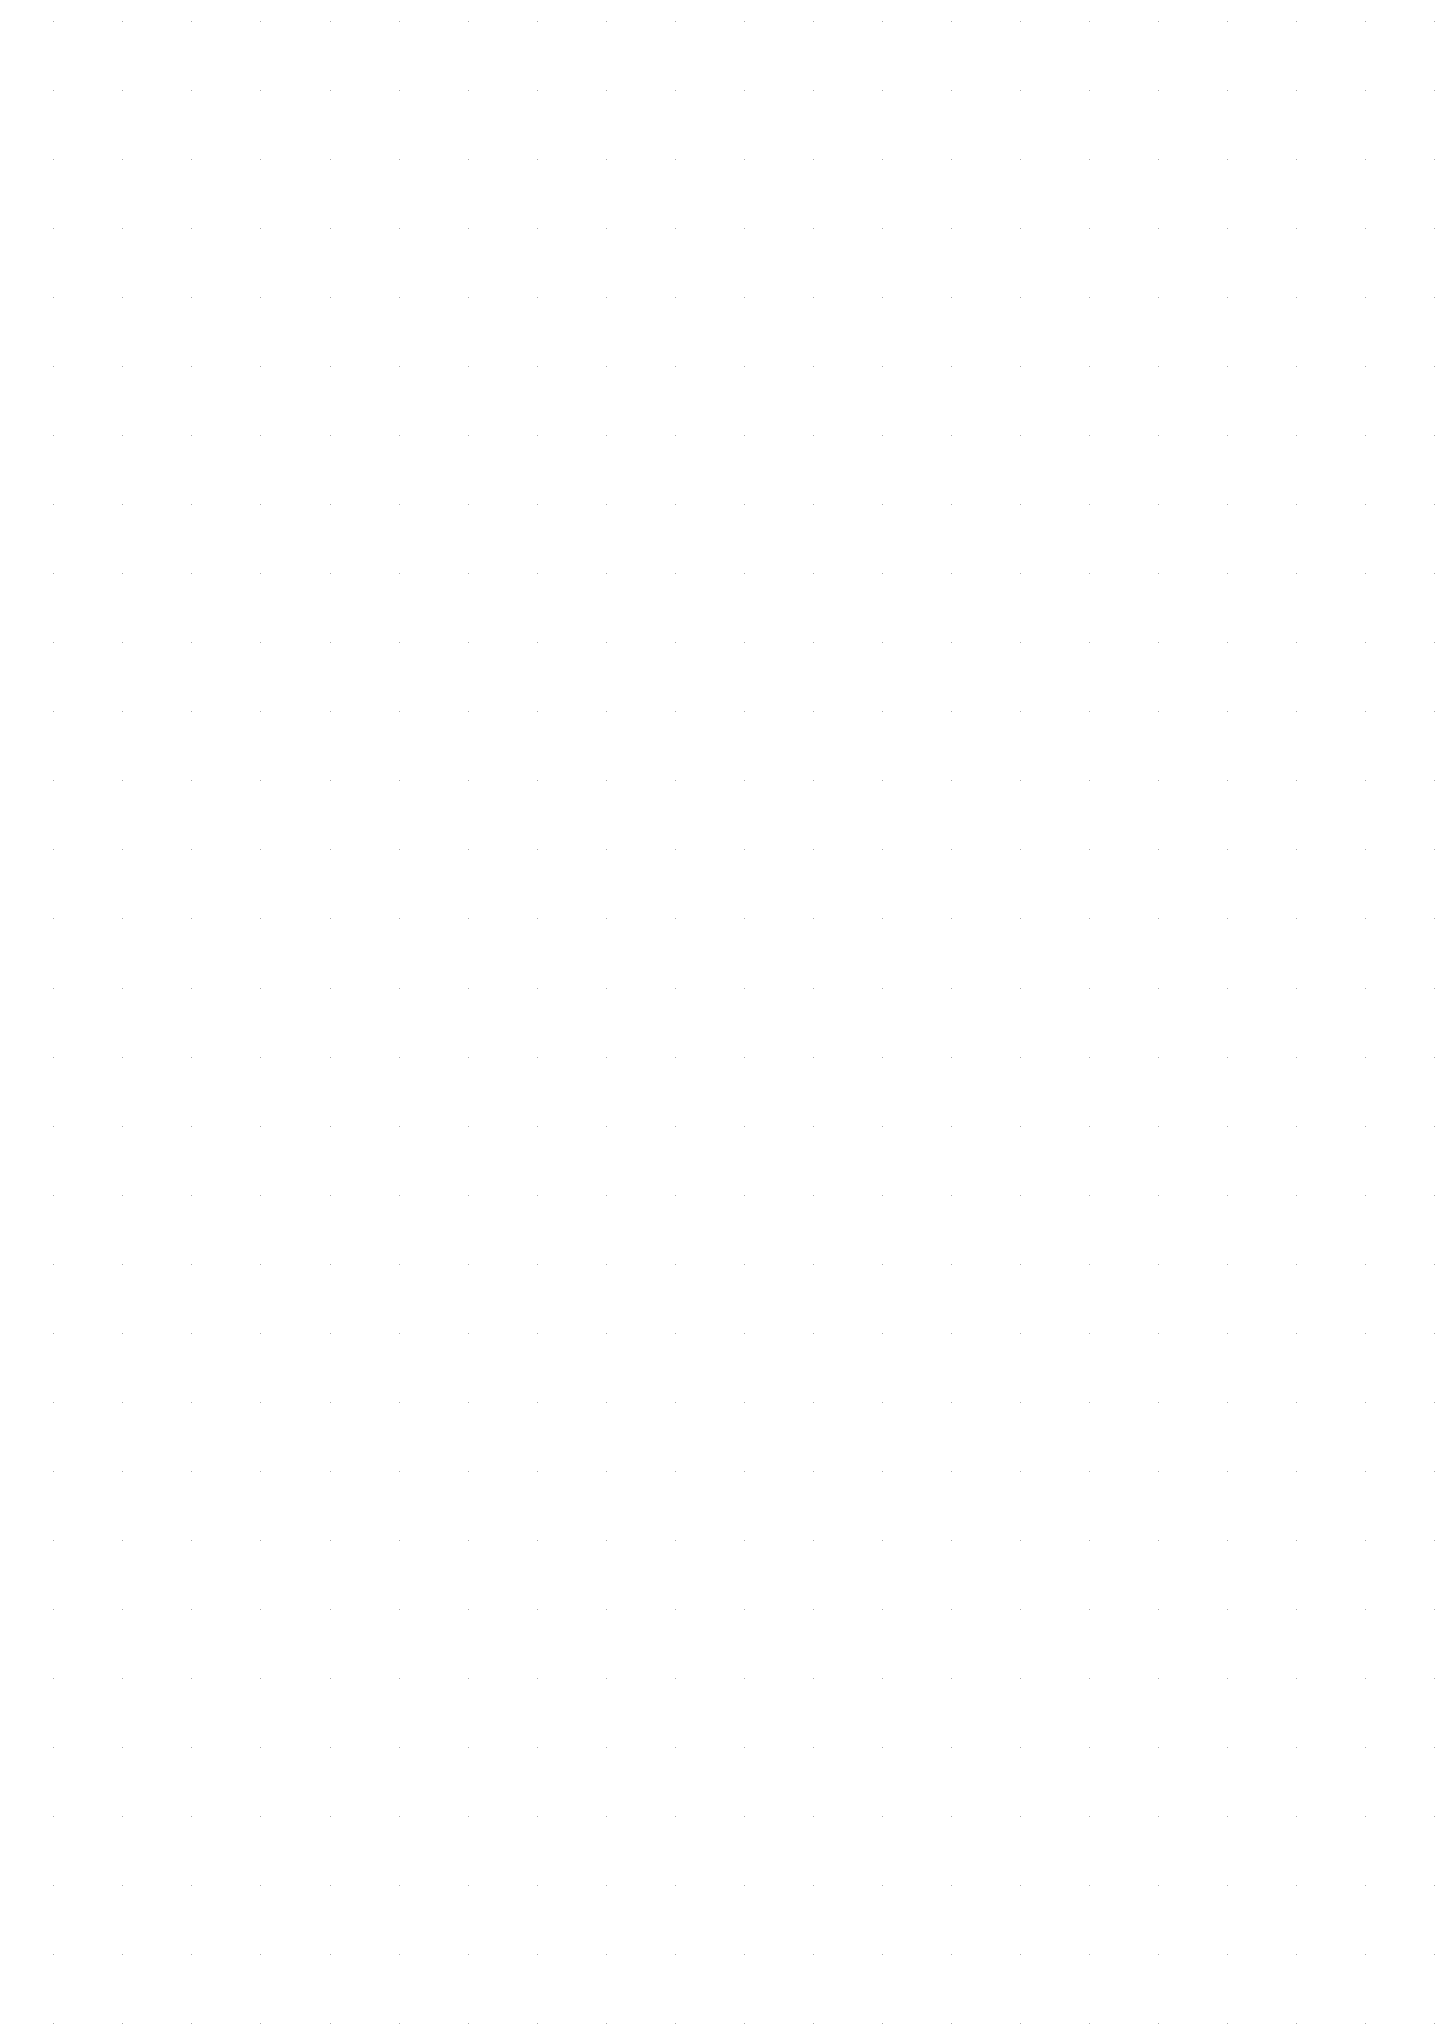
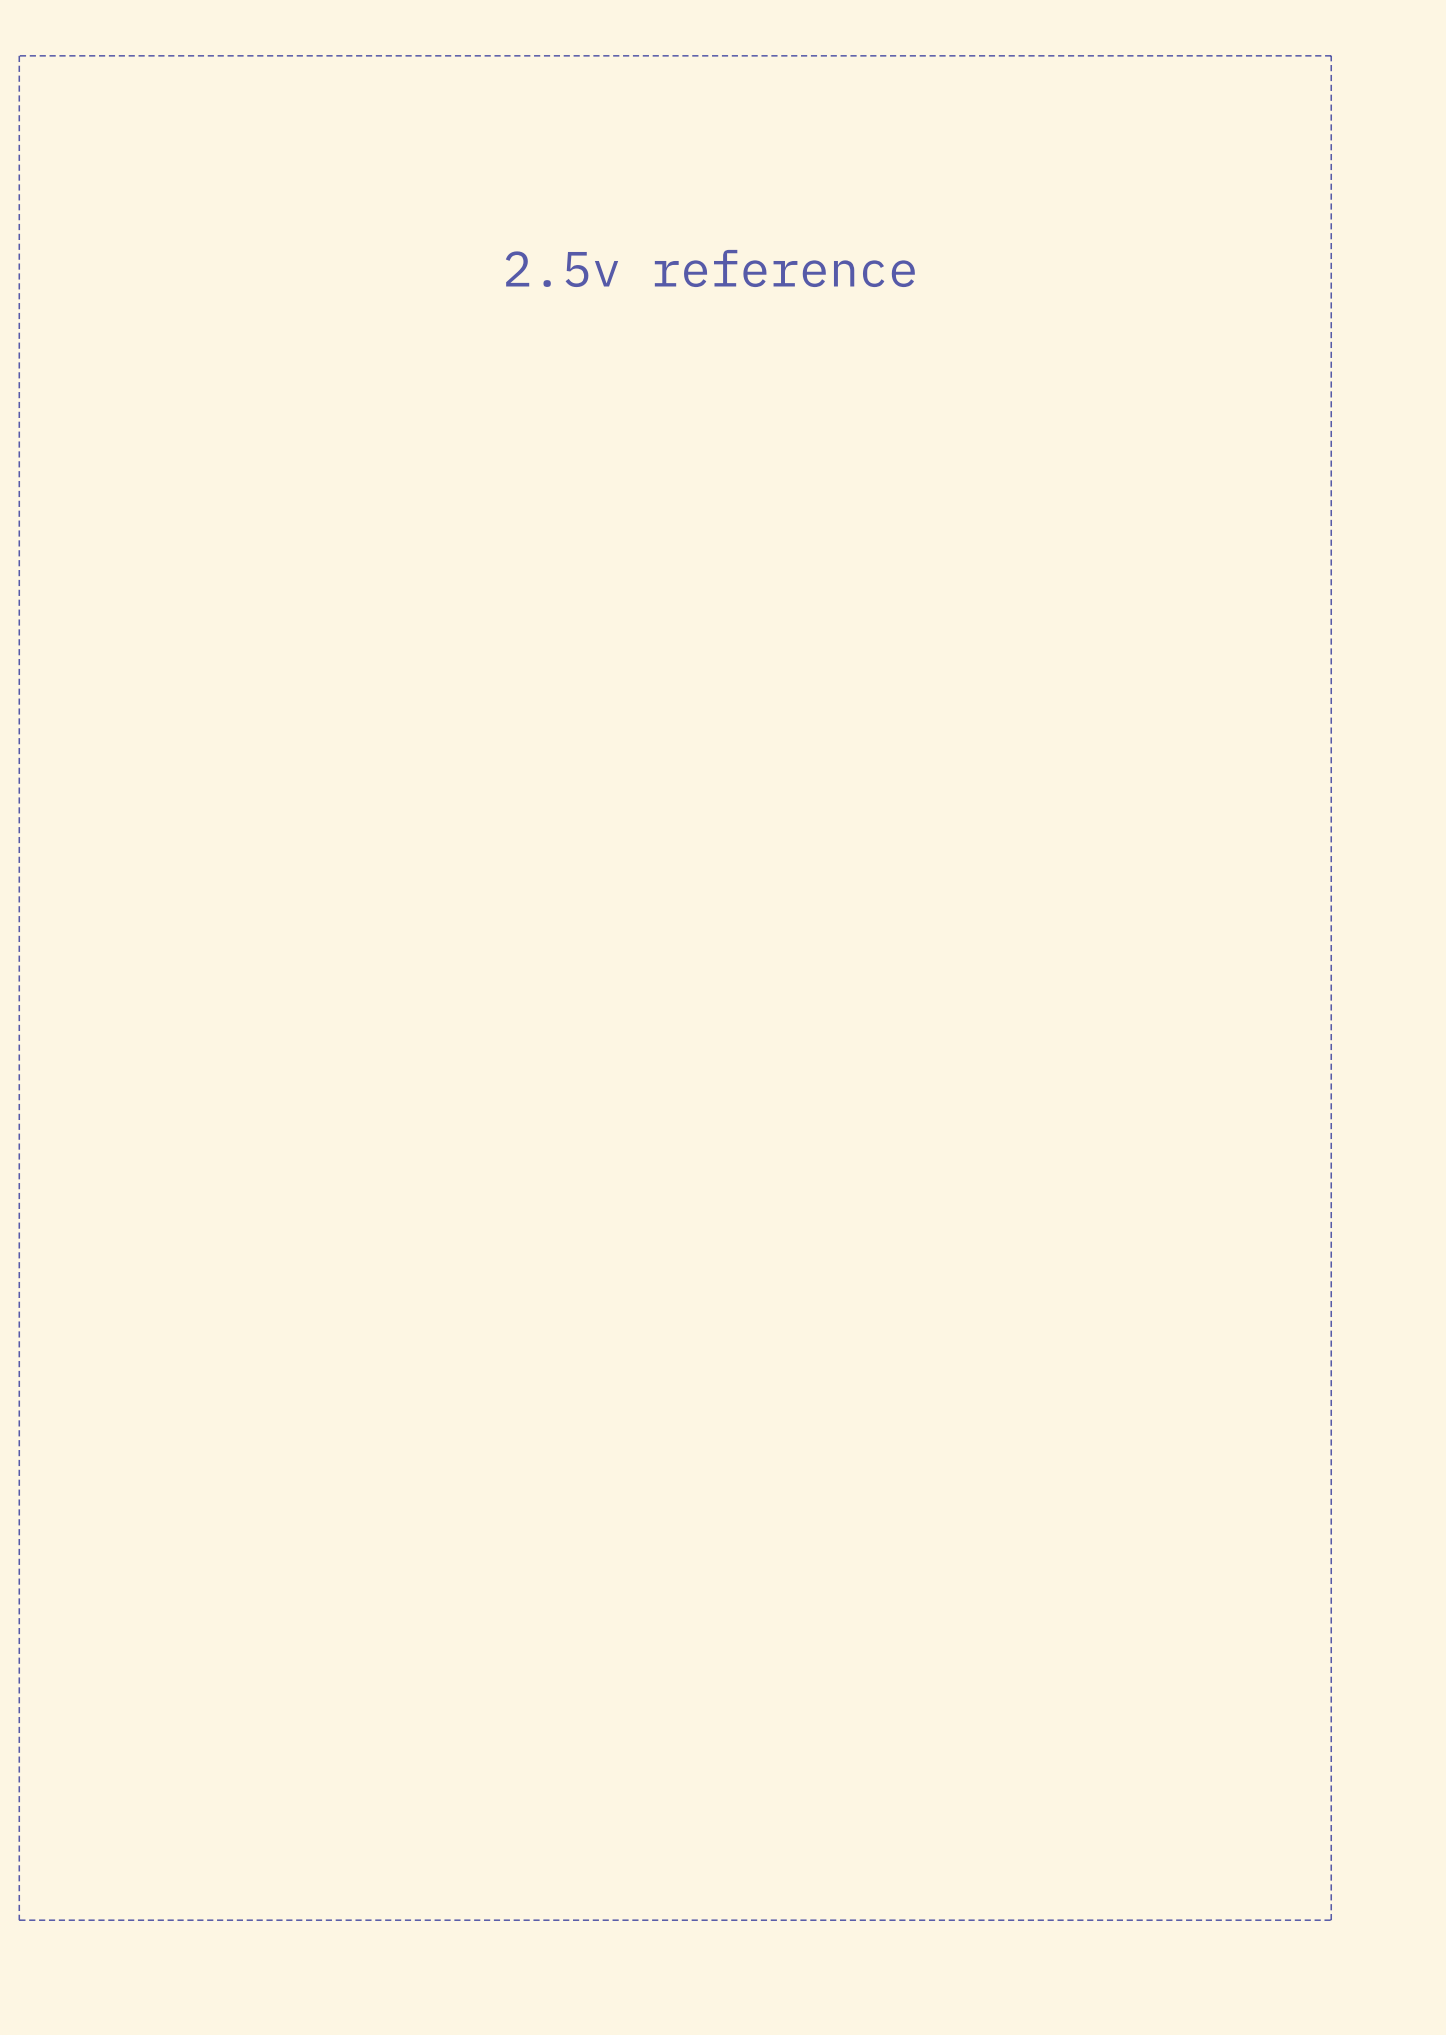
line: none -> (19, 55) (19, 1920) (1331, 1920) (1331, 55) (19, 55)
text: none -> 2.5v reference (710, 268)

